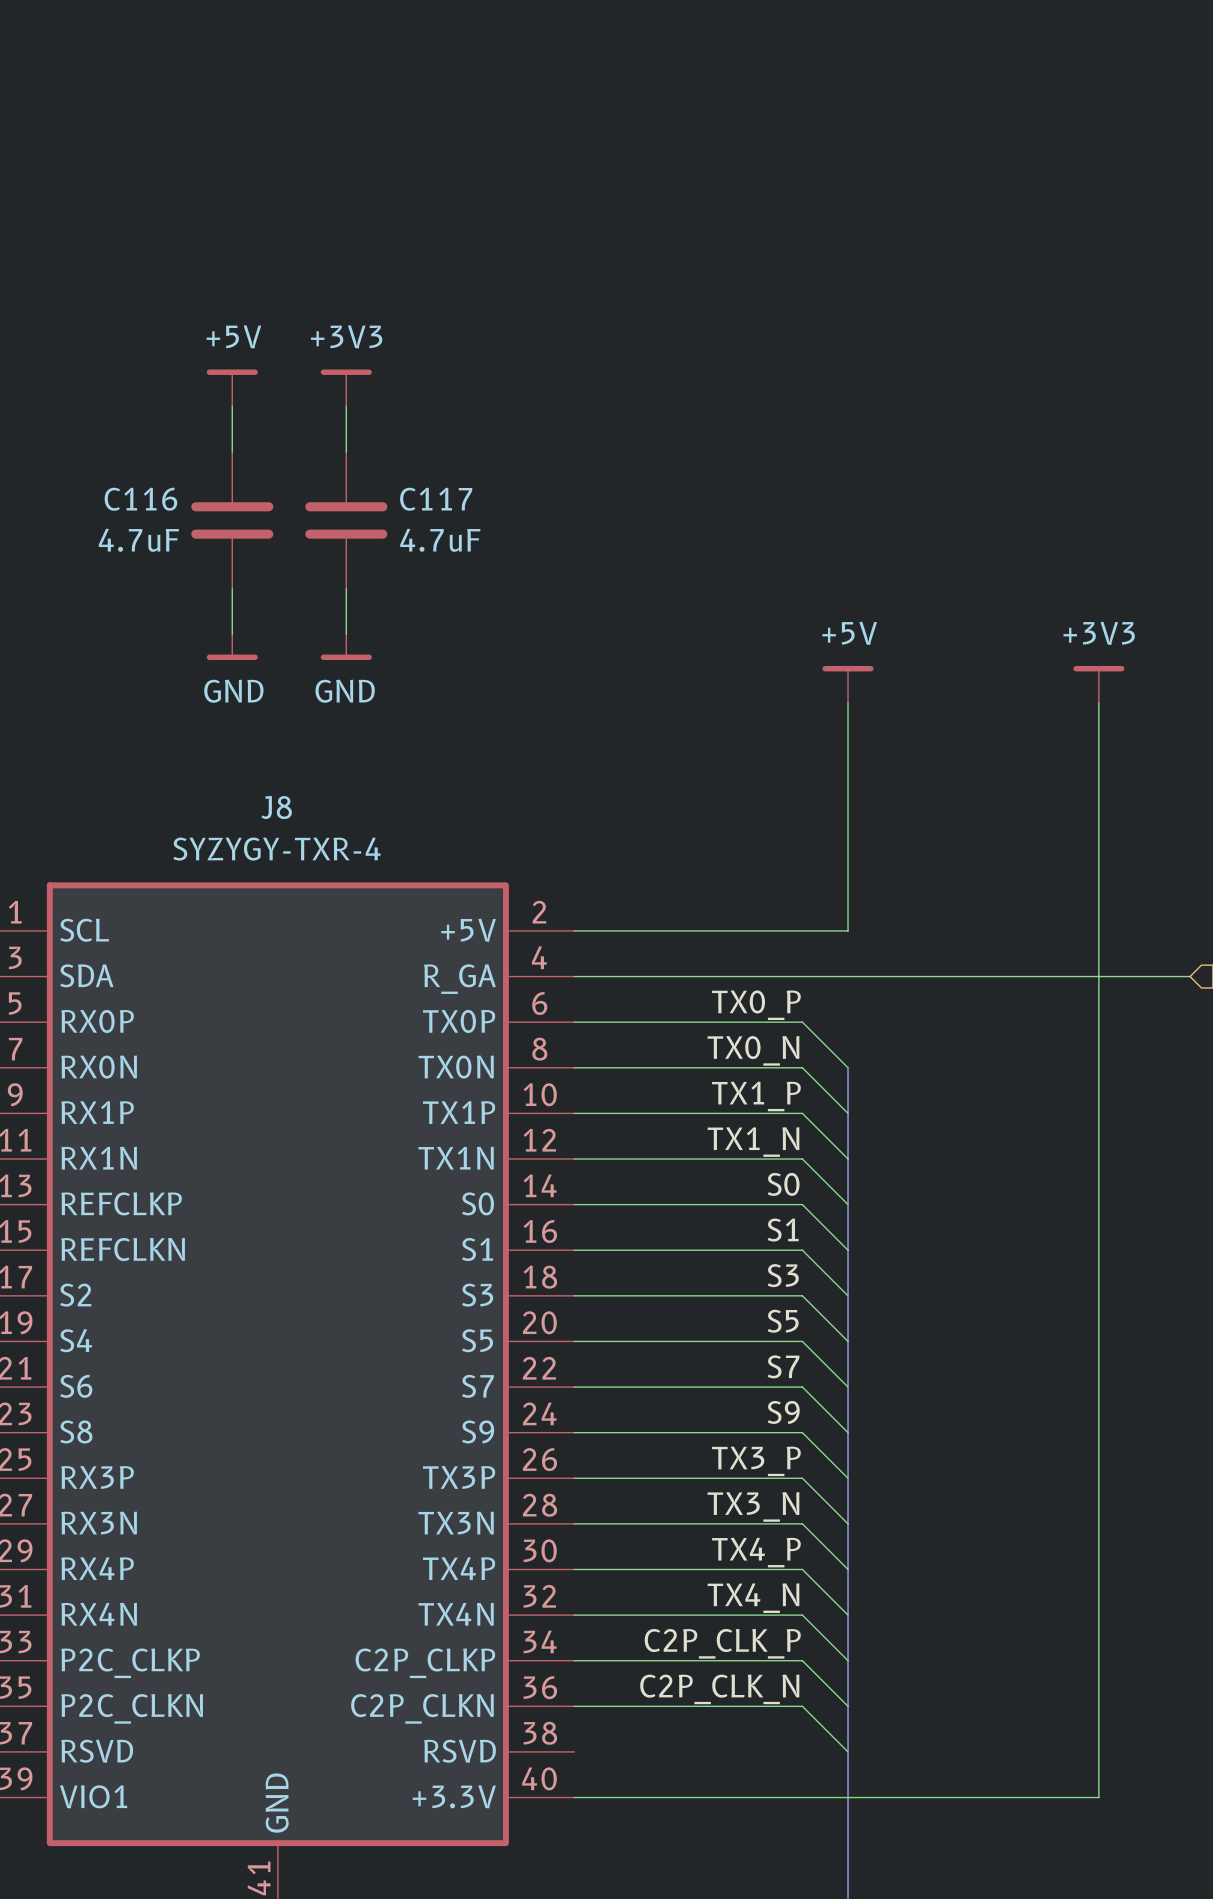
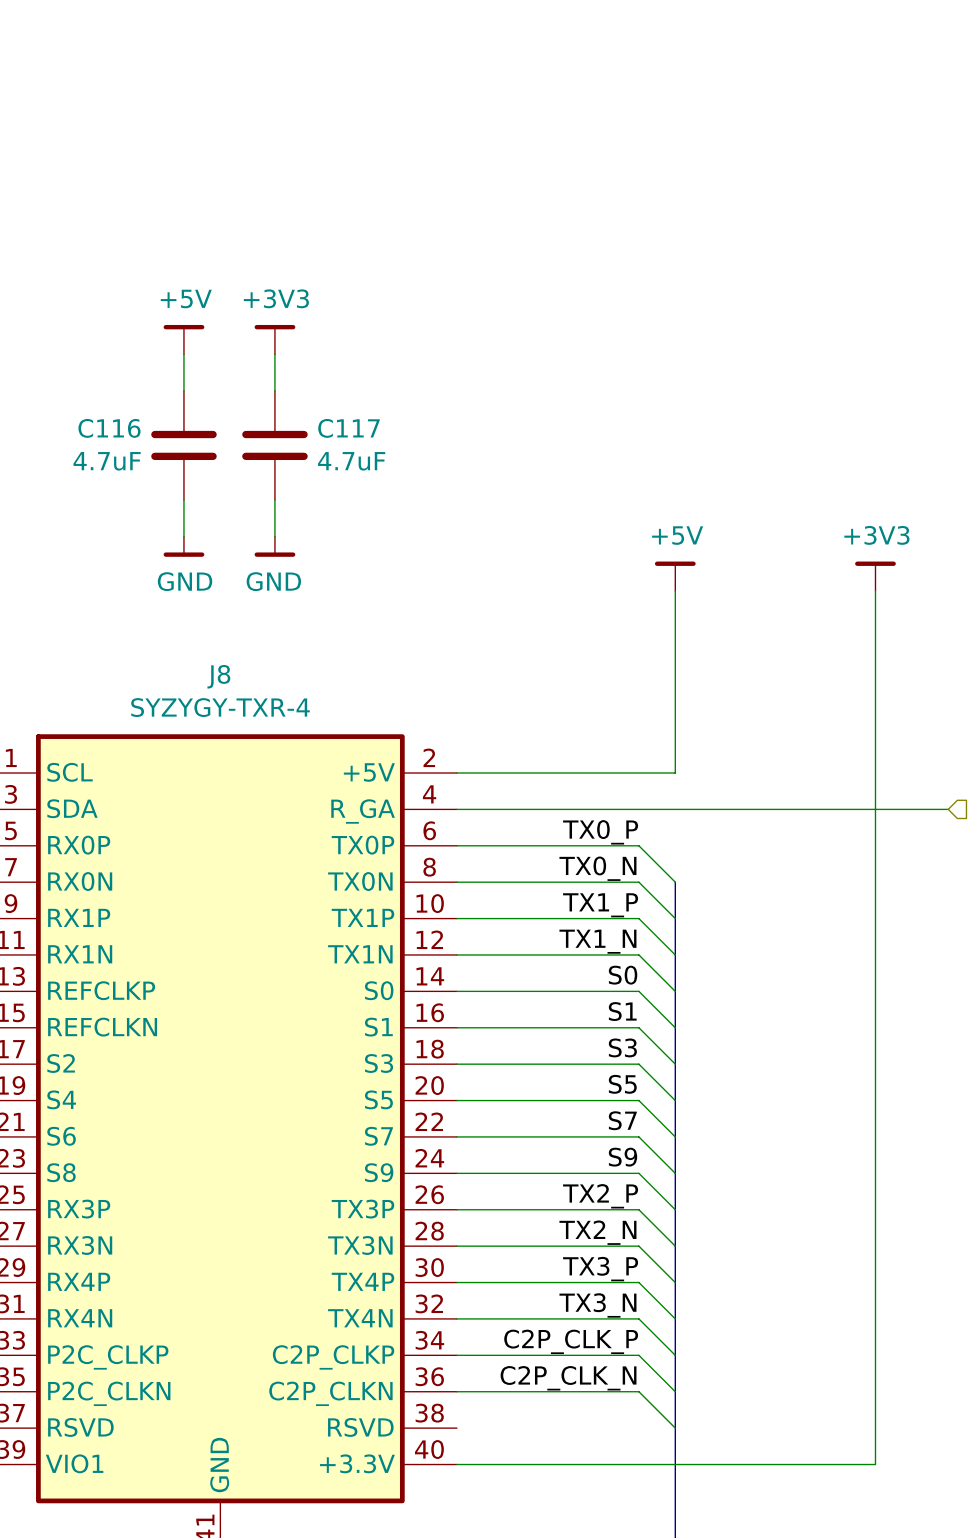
label: TX3_P (756, 1461) -> TX2_P (600, 1196)
label: TX3_N (753, 1506) -> TX2_N (597, 1232)
label: TX4_P (756, 1552) -> TX3_P (600, 1269)
label: TX4_N (753, 1598) -> TX3_N (597, 1305)

